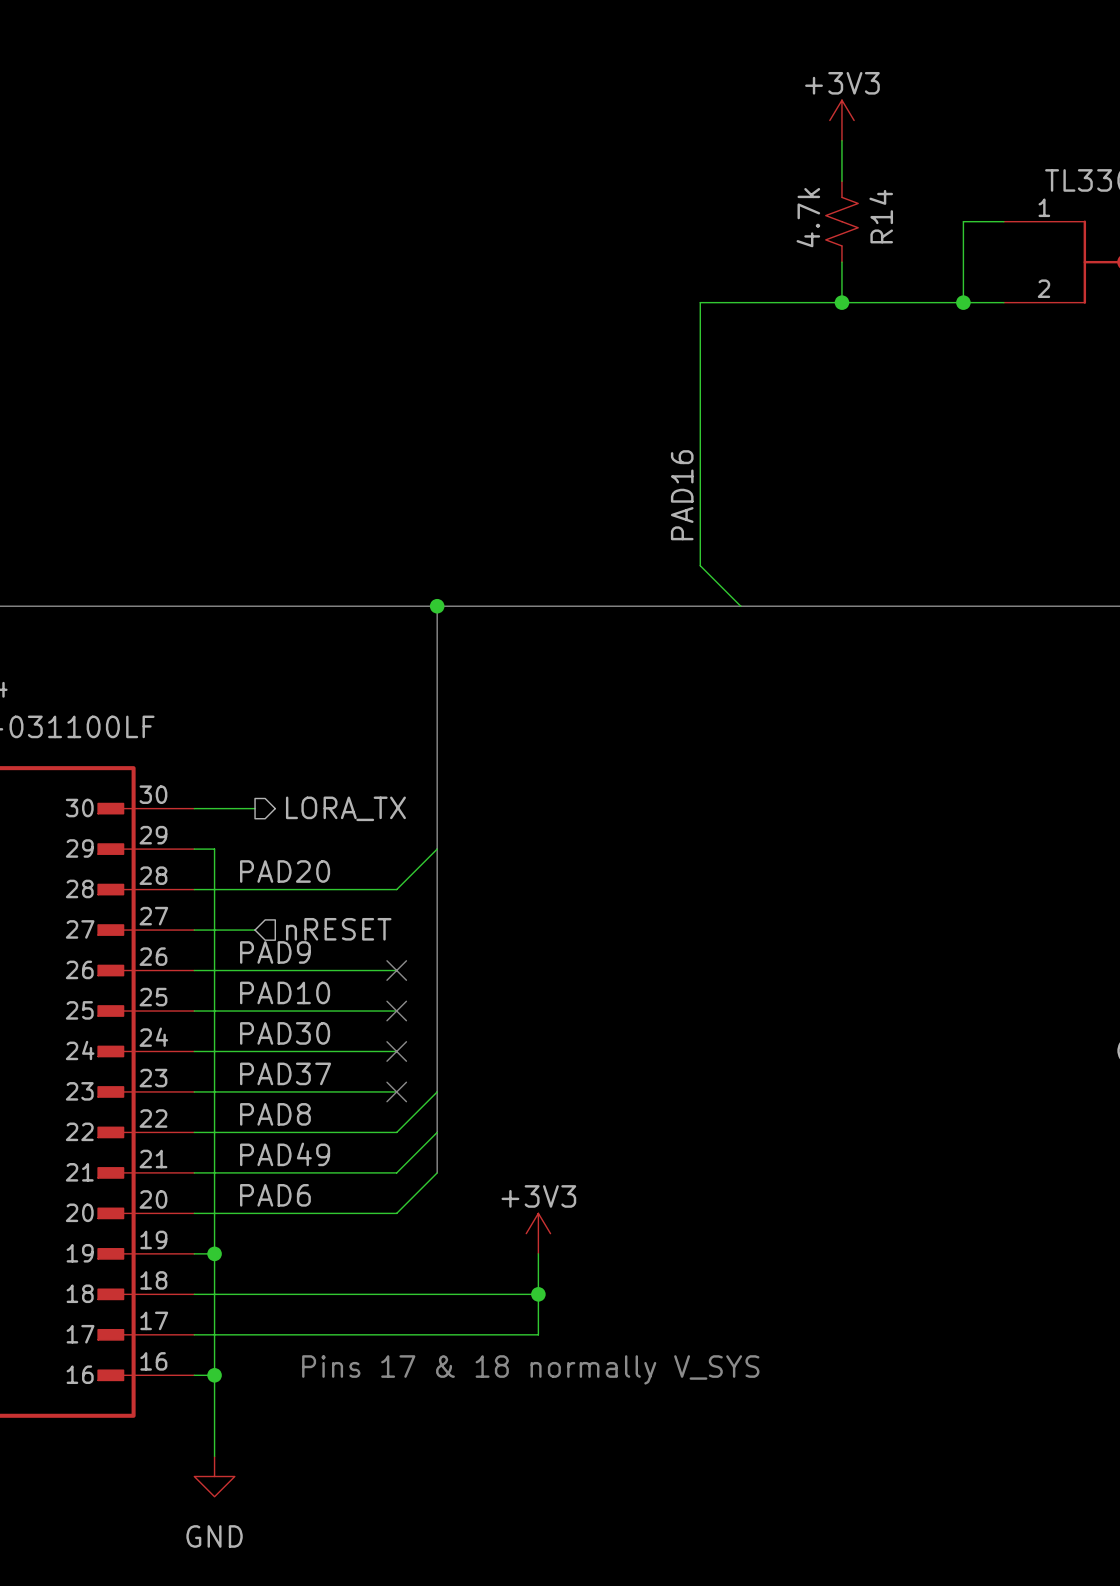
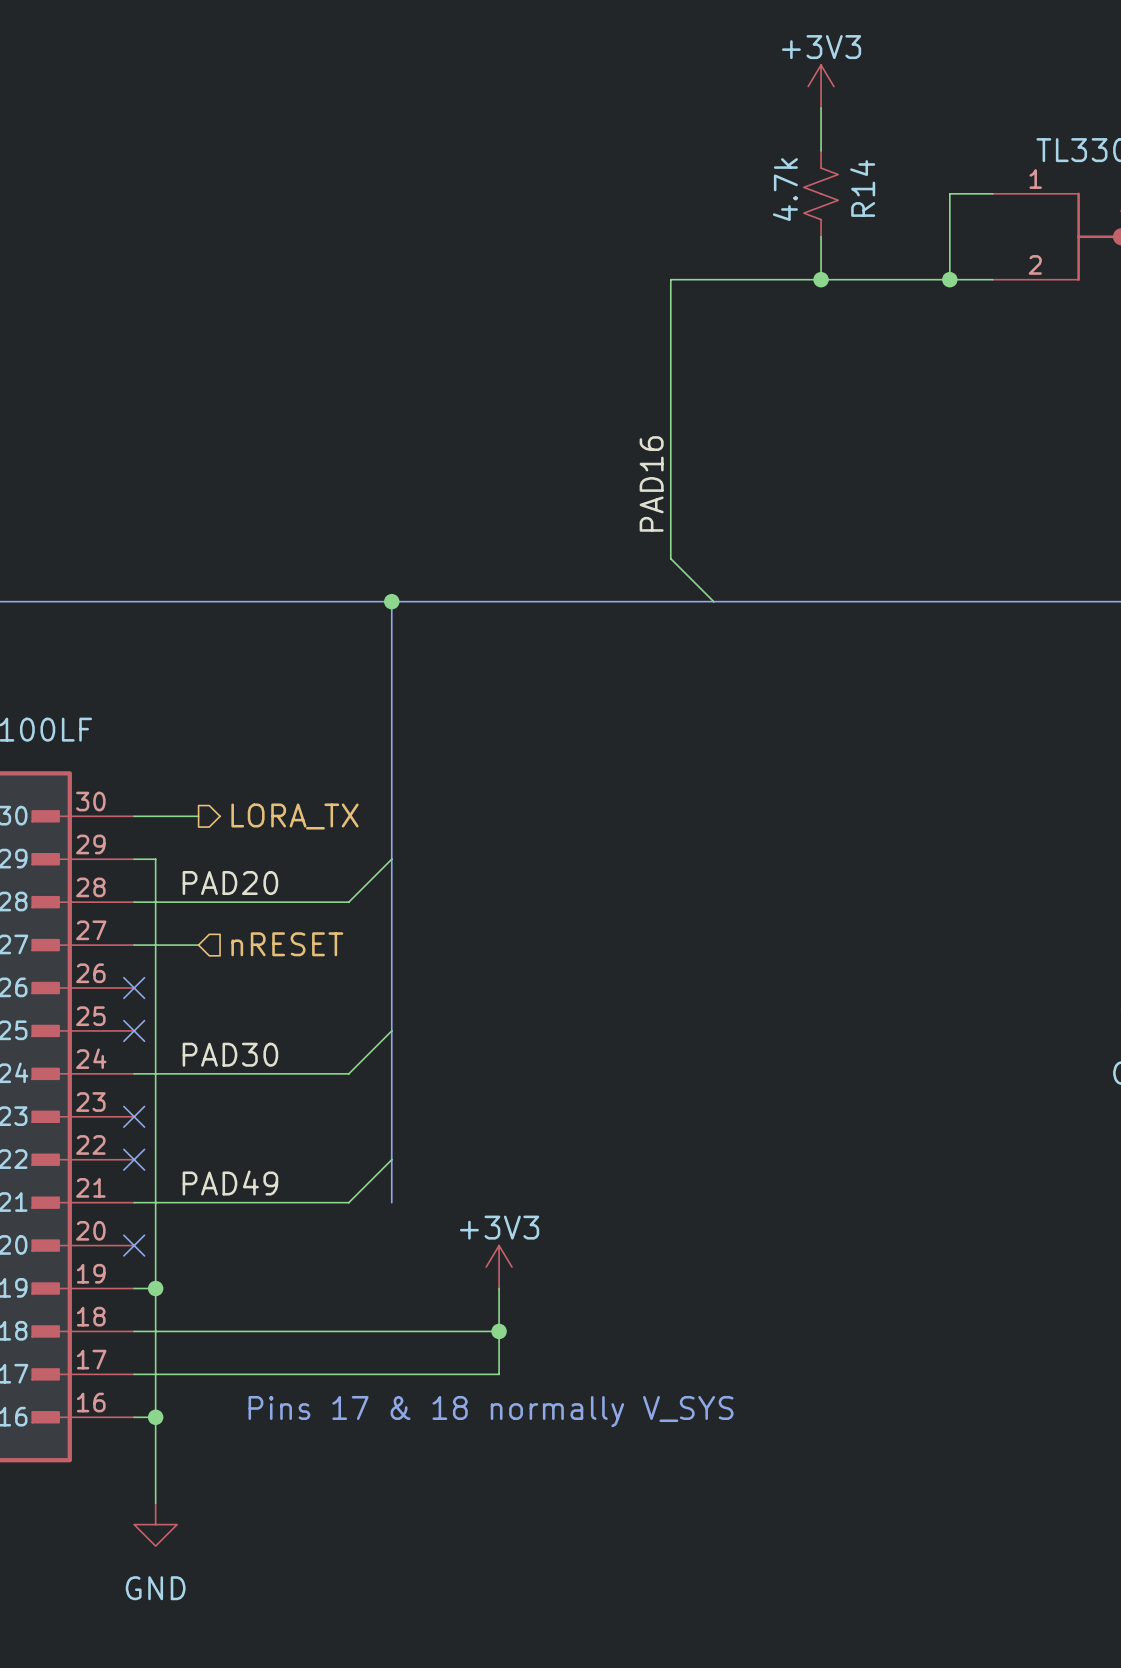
label: PAD9 (275, 952) -> none
wire: (194, 970) (396, 970) -> none
no-connect mark: none -> (134, 988)
no-connect mark: (396, 970) -> none
label: PAD10 (285, 992) -> none
wire: (194, 1011) (396, 1011) -> none
no-connect mark: none -> (134, 1030)
no-connect mark: (396, 1011) -> none
wire: none -> (391, 1030) (348, 1073)
no-connect mark: (396, 1051) -> none
label: PAD37 (285, 1073) -> none
wire: (194, 1091) (396, 1091) -> none
no-connect mark: none -> (134, 1116)
no-connect mark: (396, 1091) -> none
wire: (437, 1091) (396, 1132) (194, 1132) -> none
label: PAD8 (275, 1114) -> none
no-connect mark: none -> (134, 1159)
wire: (437, 1172) (396, 1213) (194, 1213) -> none
label: PAD6 (275, 1195) -> none
no-connect mark: none -> (134, 1245)

